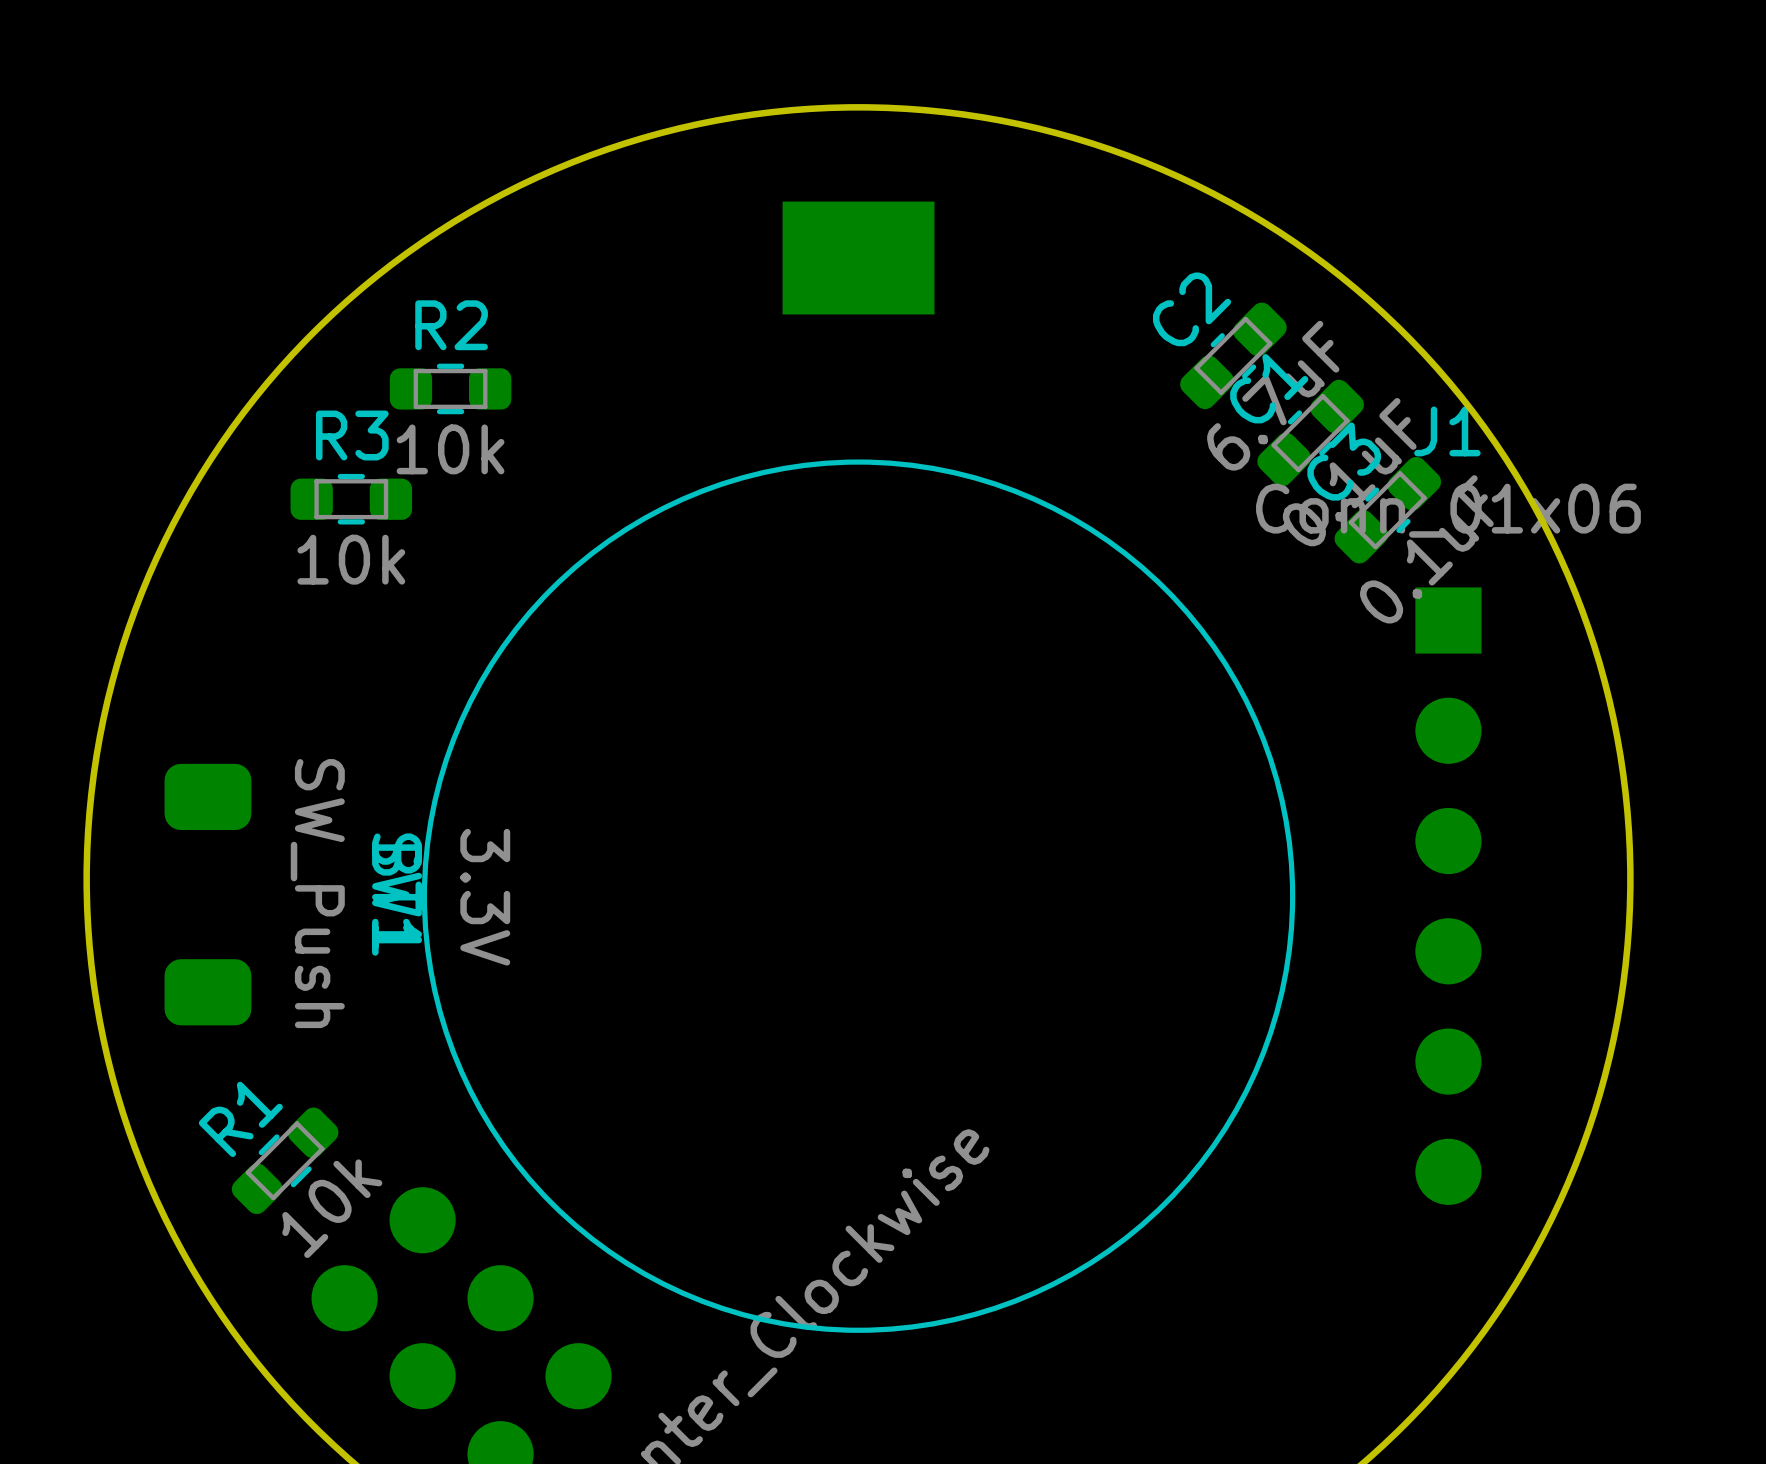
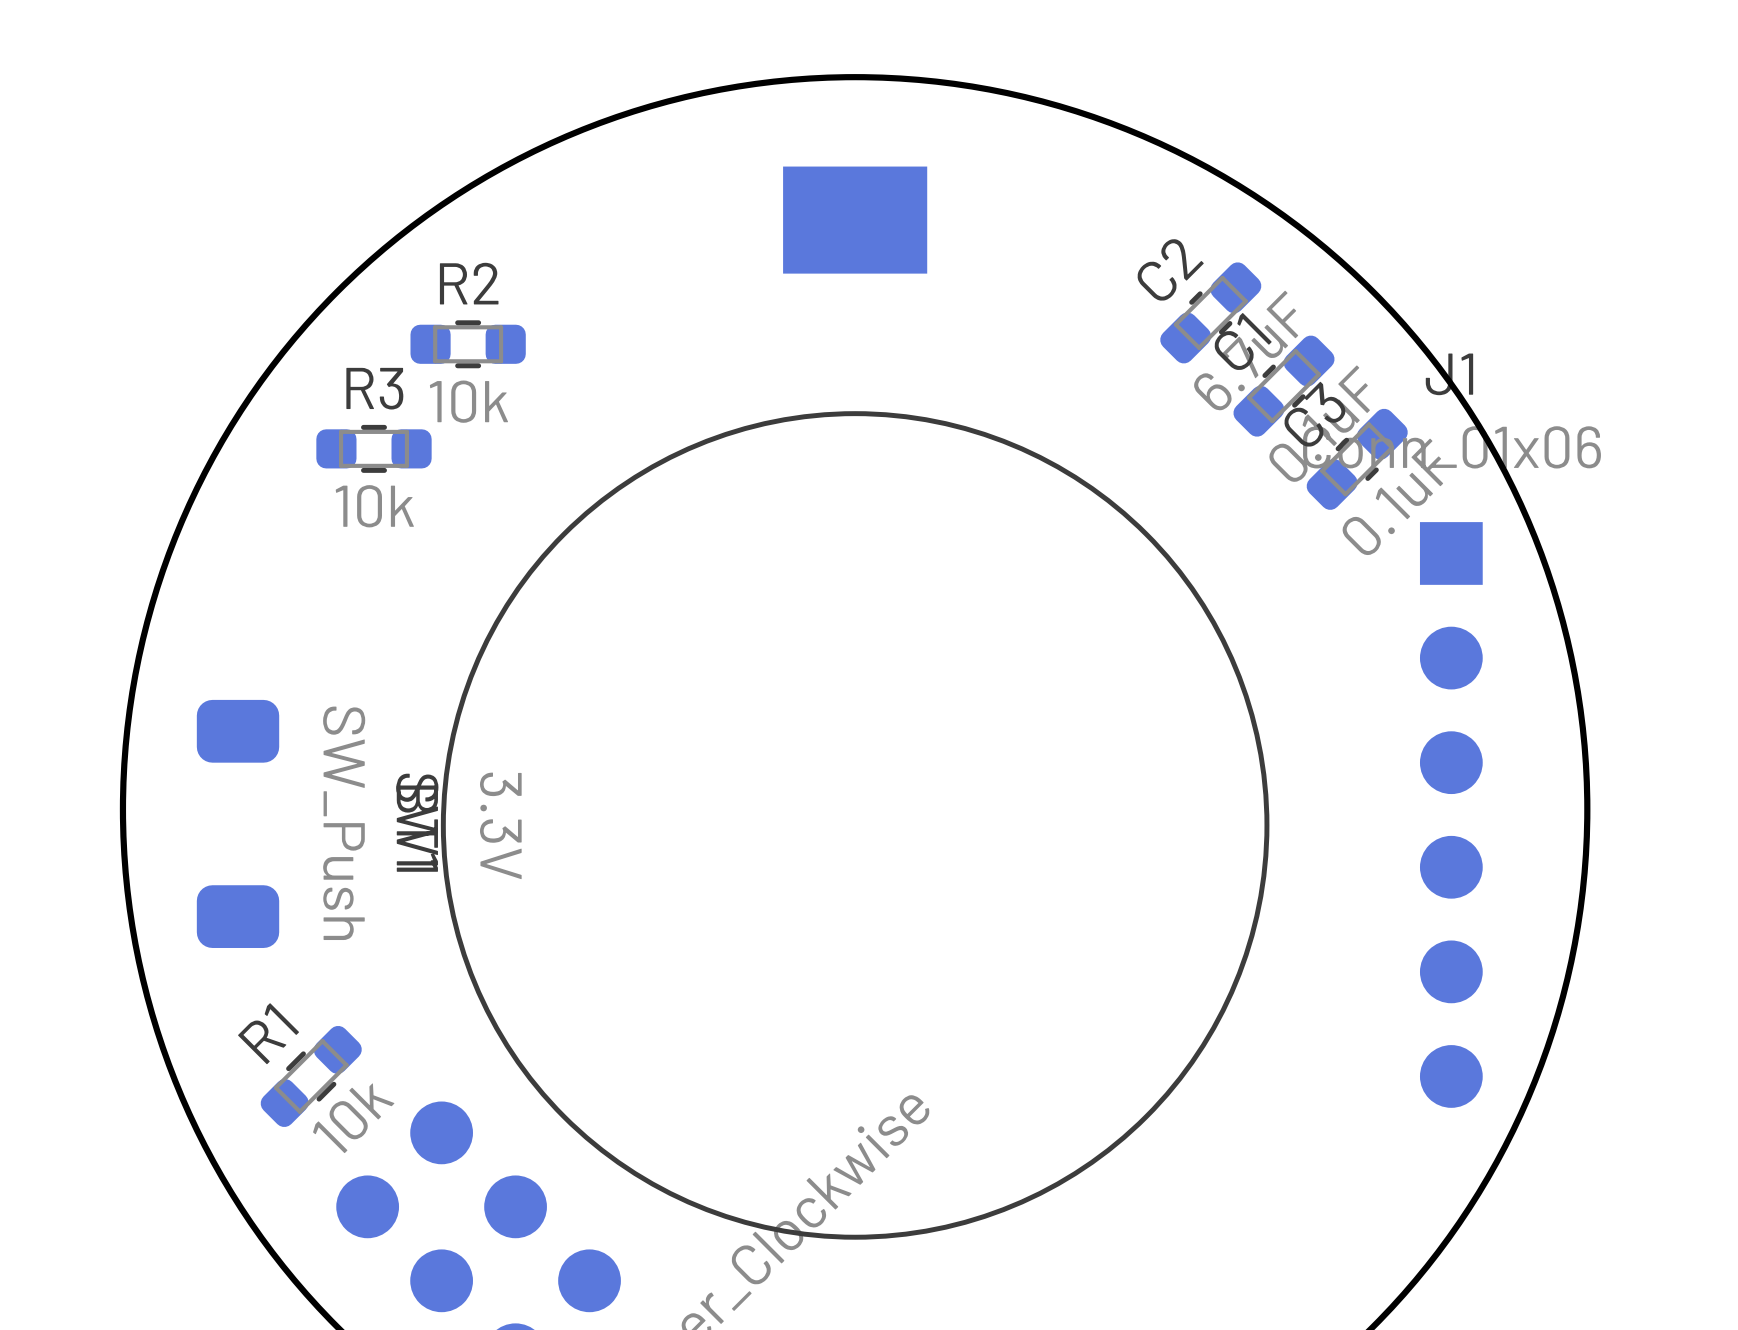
J1 position: (1448, 896) -> (1451, 814)

